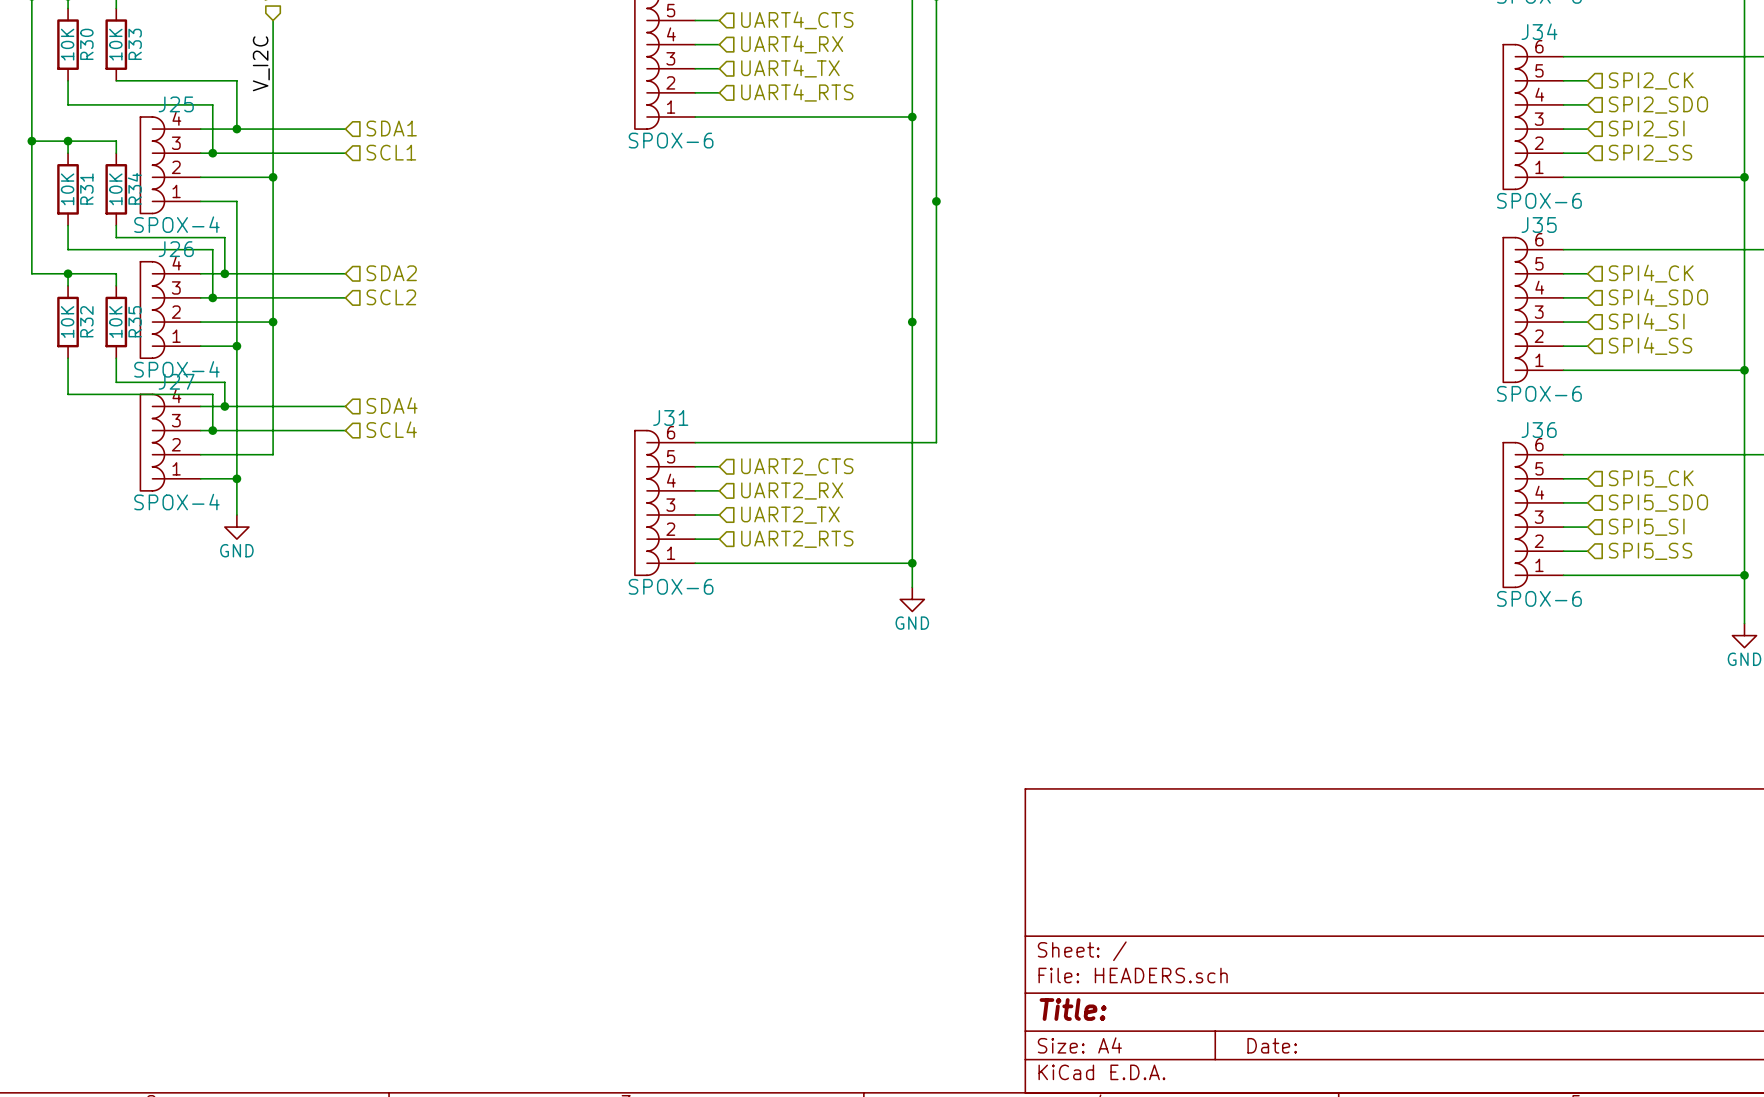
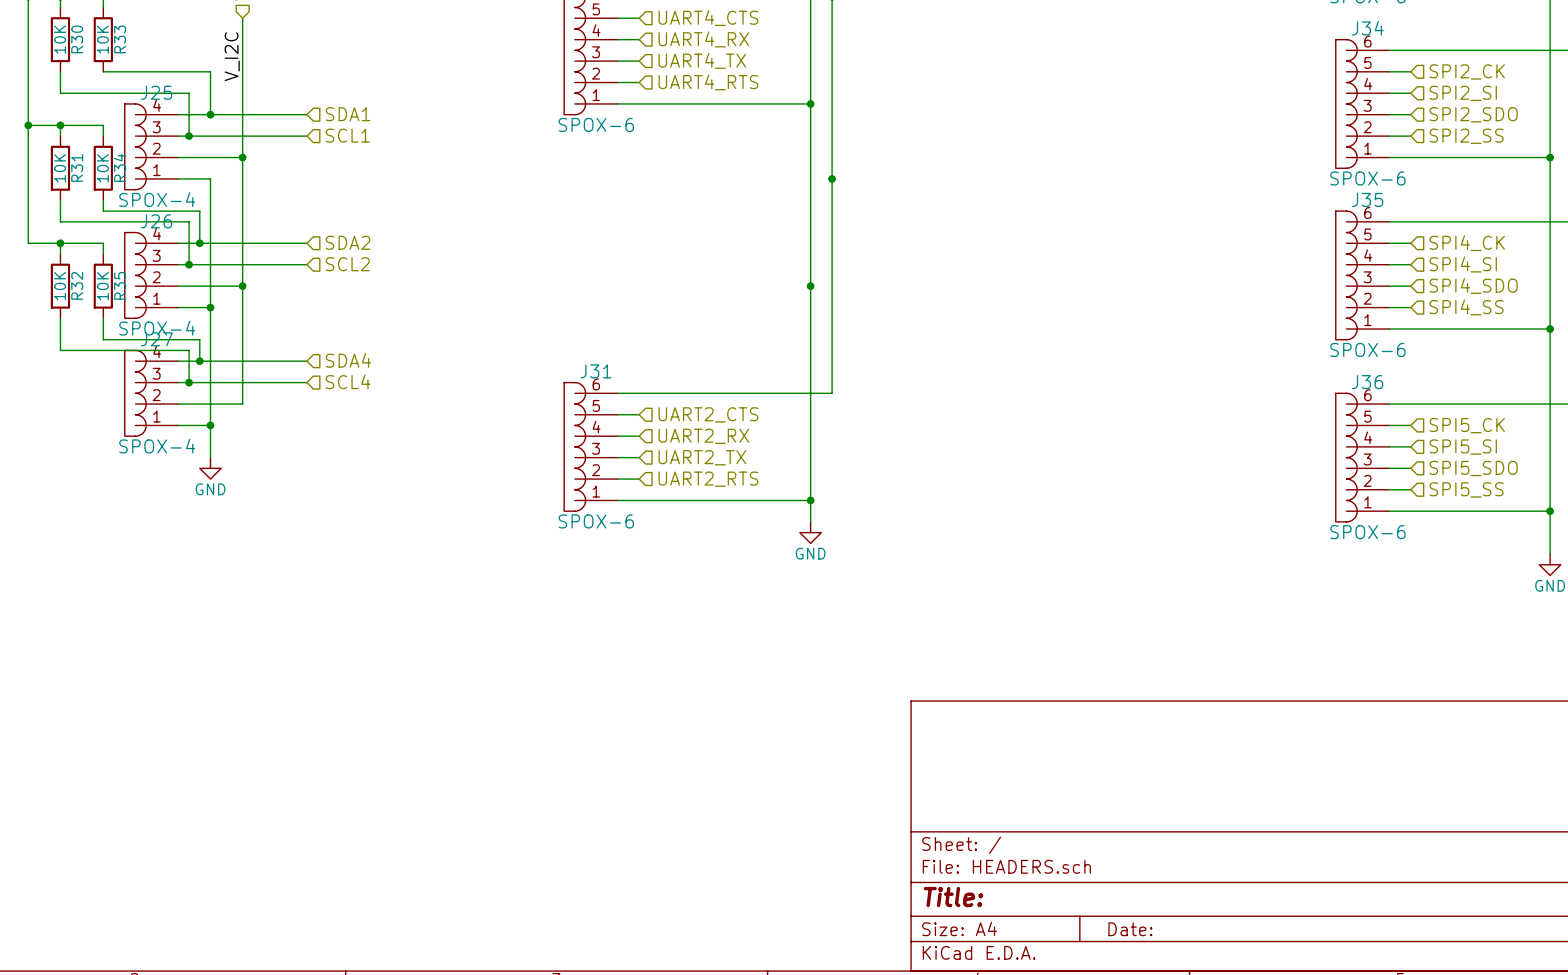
hierarchical label: SPI2_SDO (1658, 105) -> SPI2_SI (1463, 93)
hierarchical label: SPI2_SI (1646, 129) -> SPI2_SDO (1473, 114)
hierarchical label: SPI4_SDO (1658, 297) -> SPI4_SI (1463, 264)
hierarchical label: SPI4_SI (1646, 321) -> SPI4_SDO (1473, 285)
hierarchical label: SPI5_SDO (1658, 503) -> SPI5_SI (1463, 447)
hierarchical label: SPI5_SI (1646, 527) -> SPI5_SDO (1473, 468)

